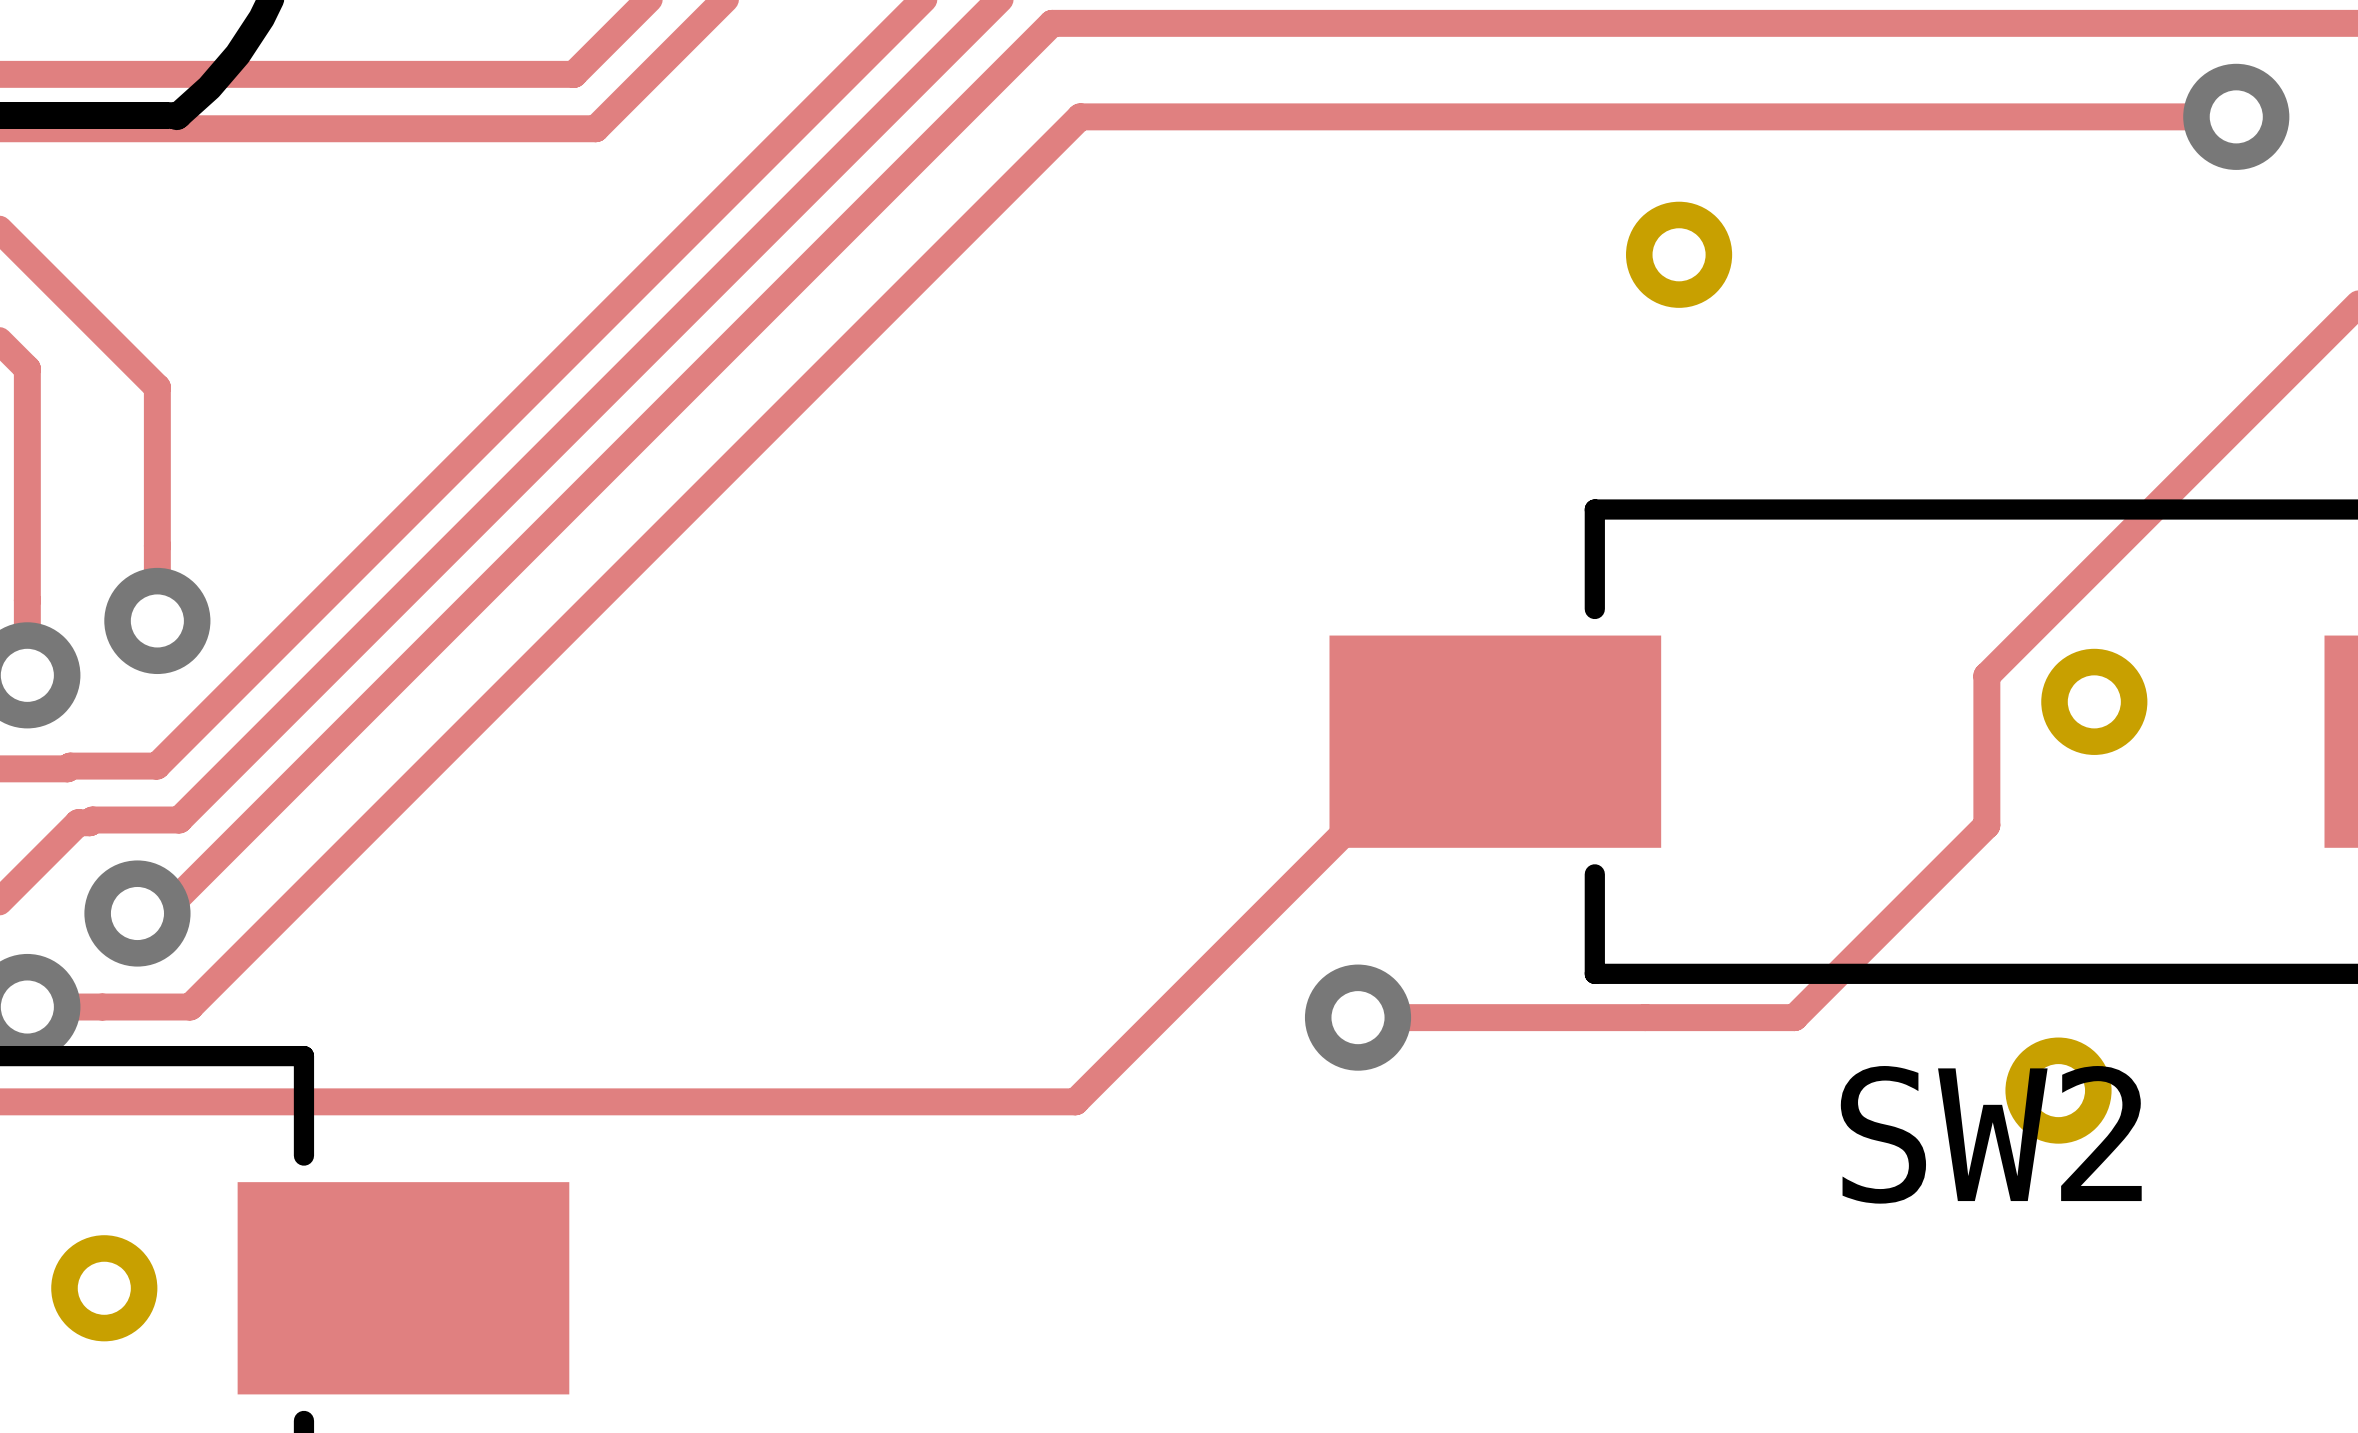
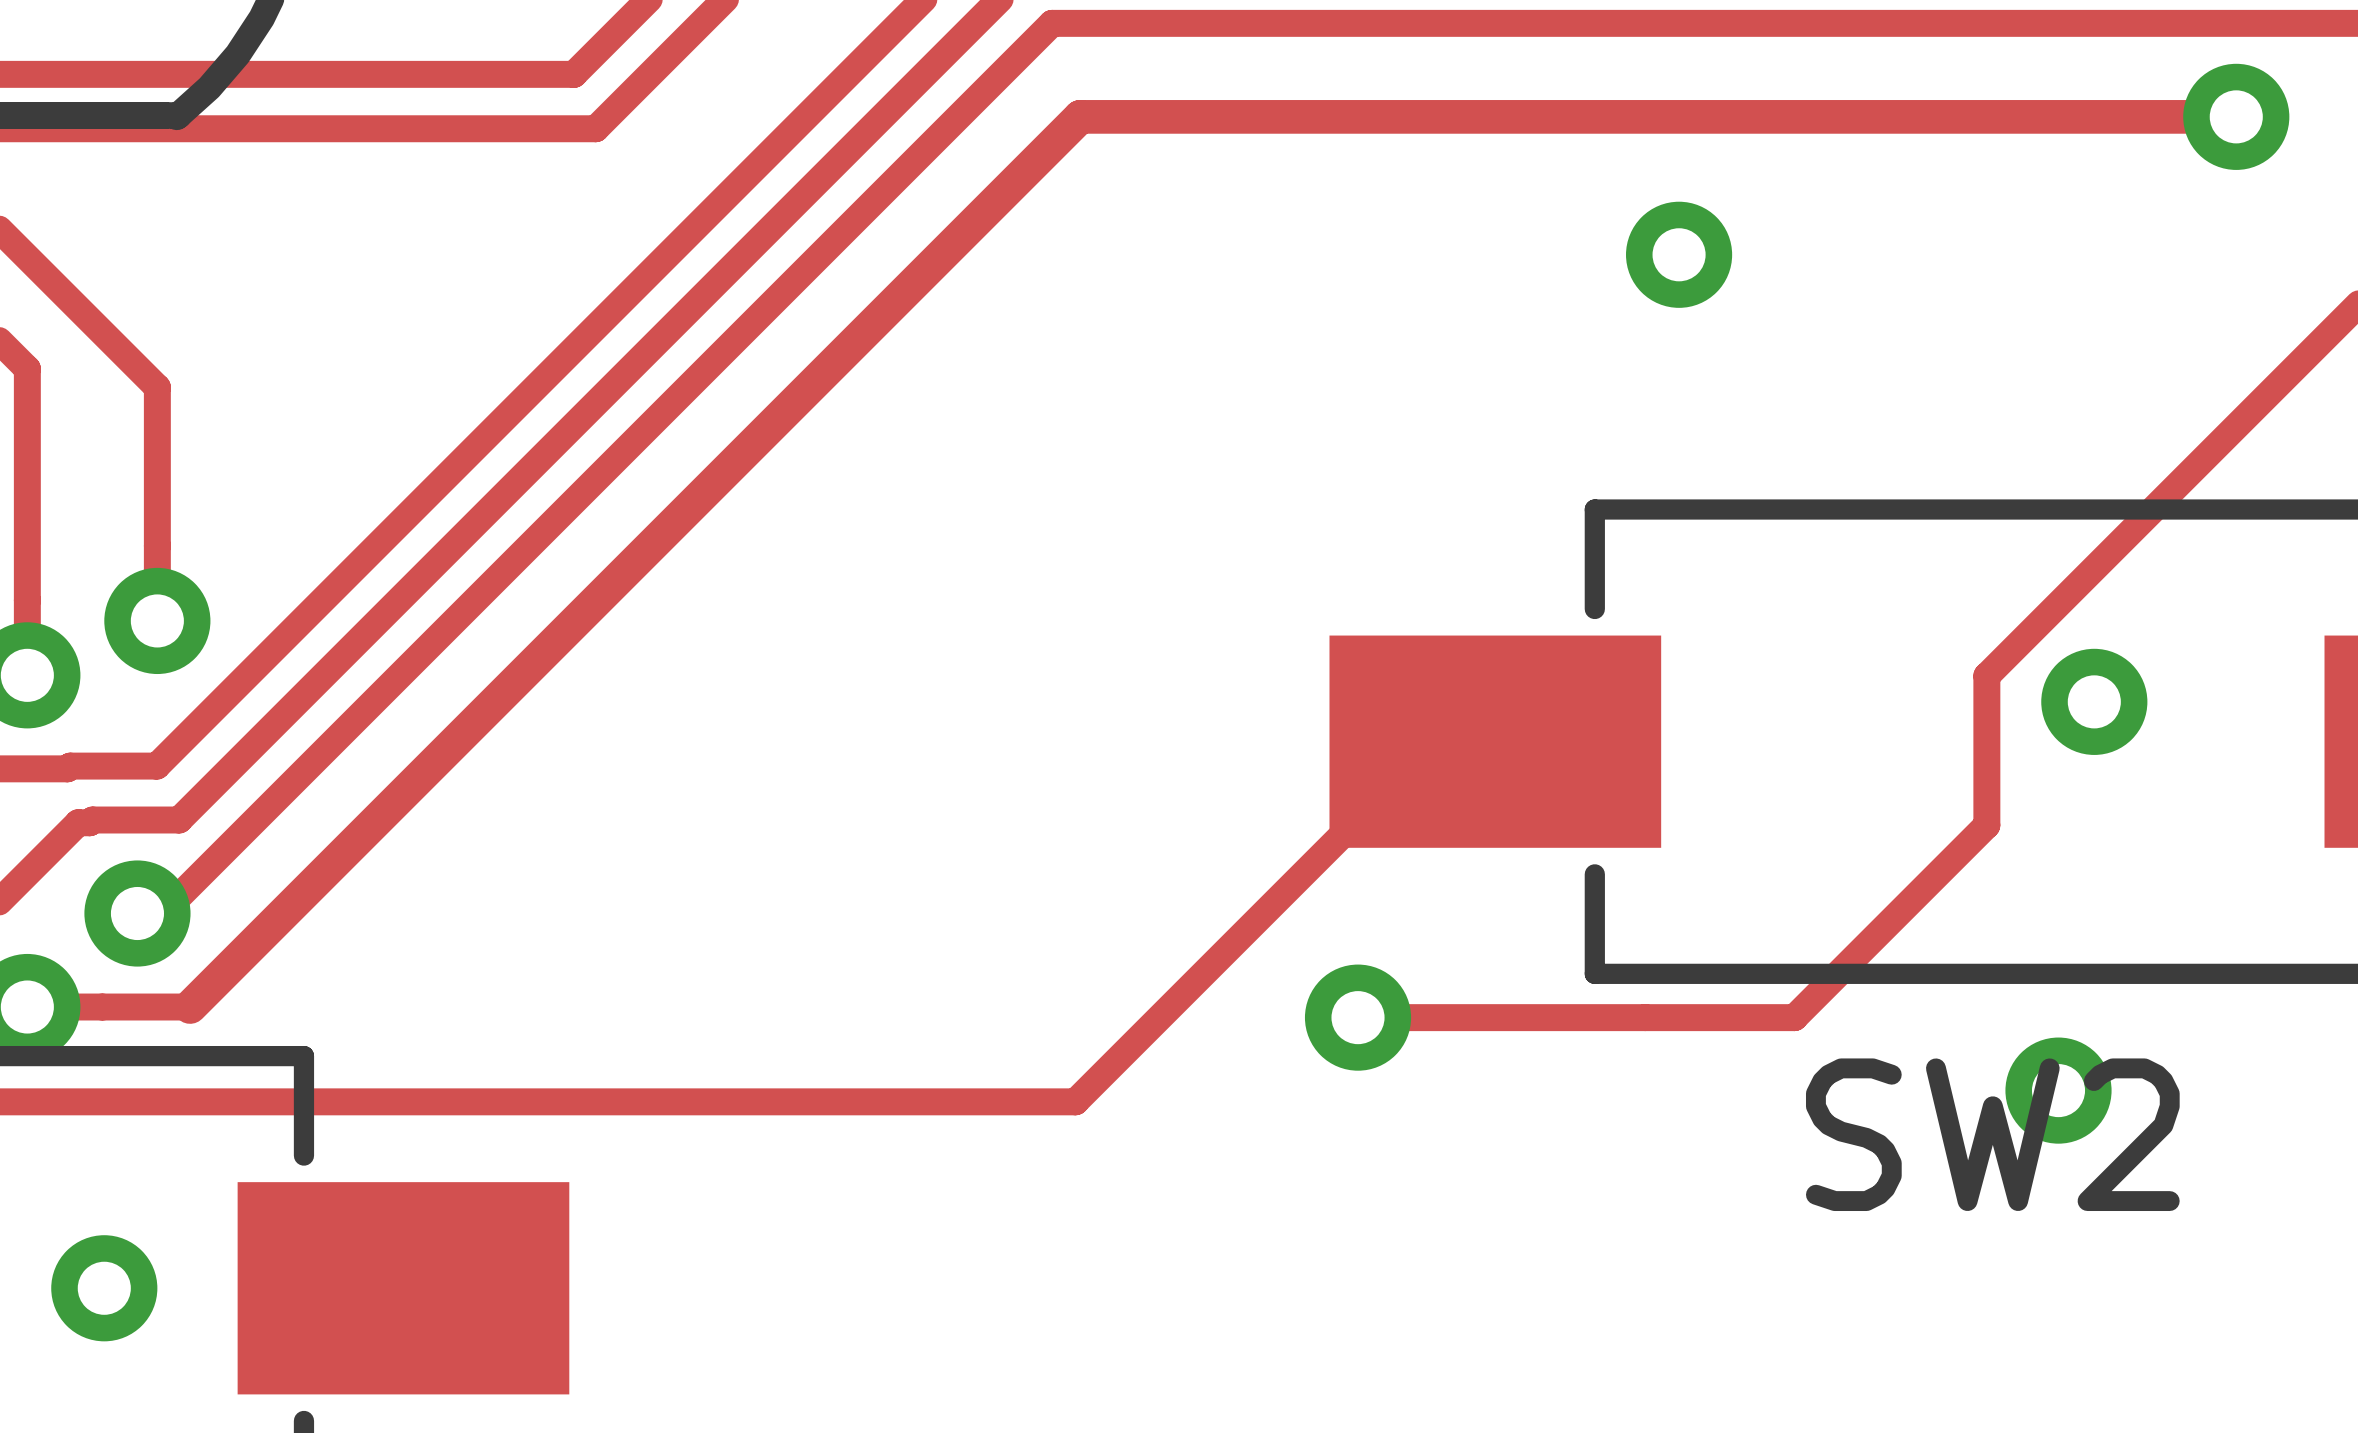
track width: thin (2236, 116) (1080, 116) (190, 1007) -> thick (2236, 116) (1080, 116) (190, 1007)

